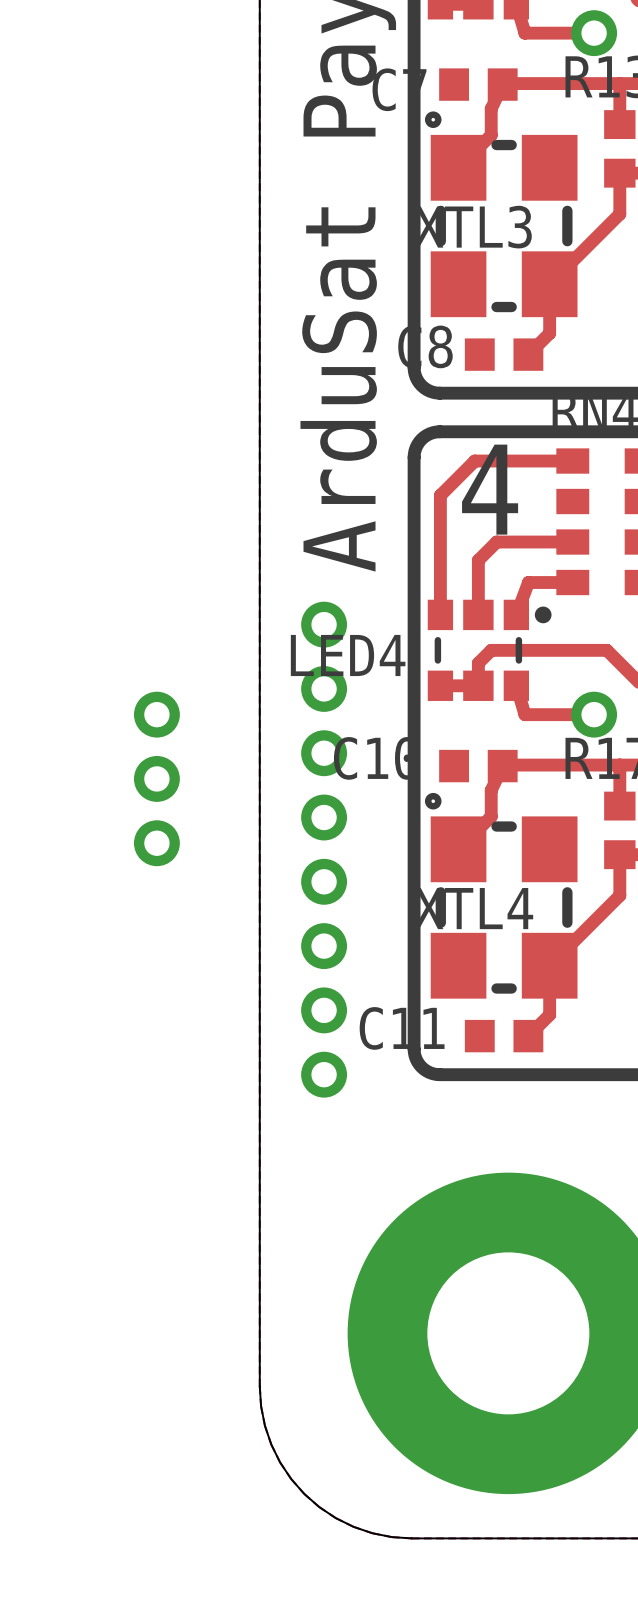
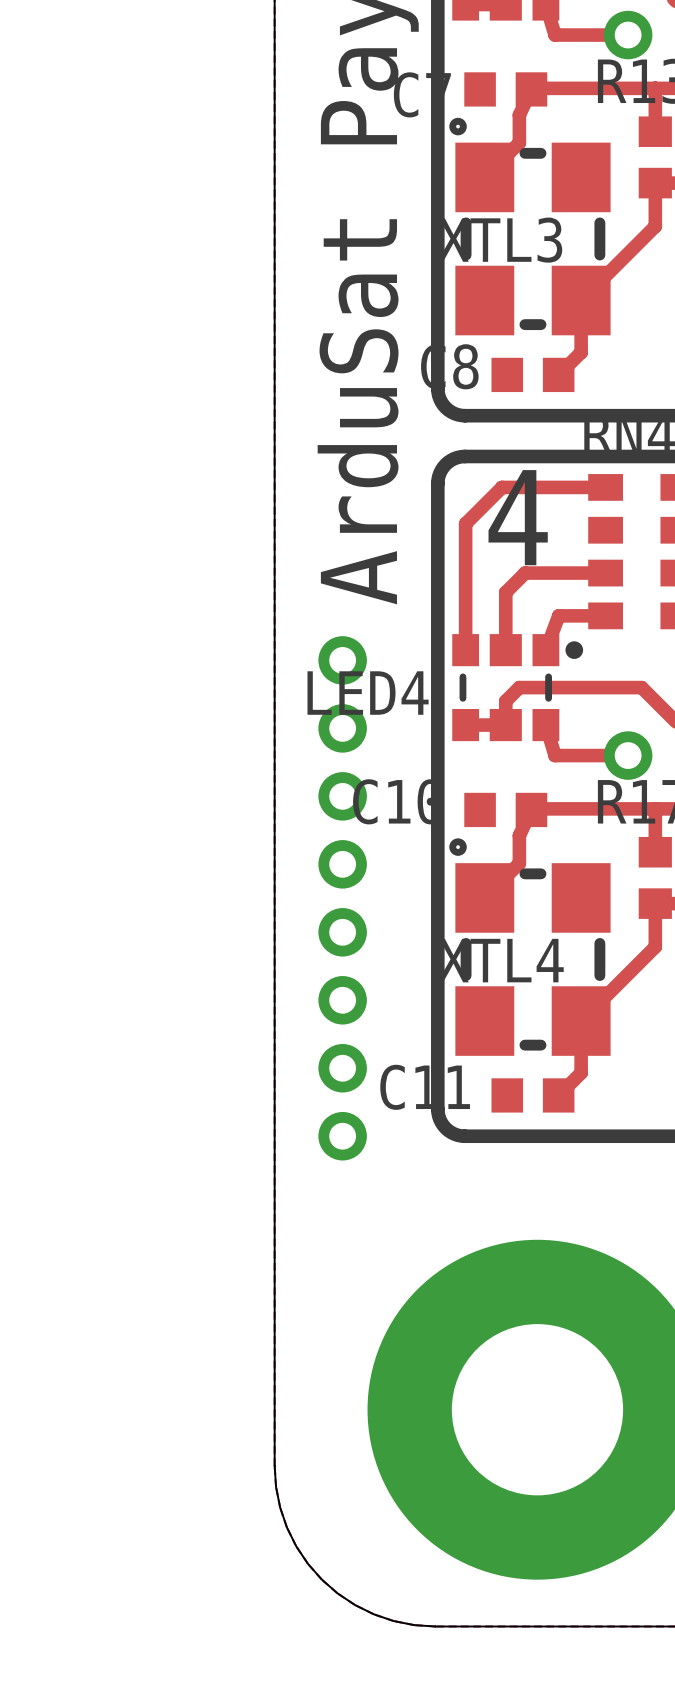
via: (156, 714) -> none
via: (156, 778) -> none
via: (156, 843) -> none

